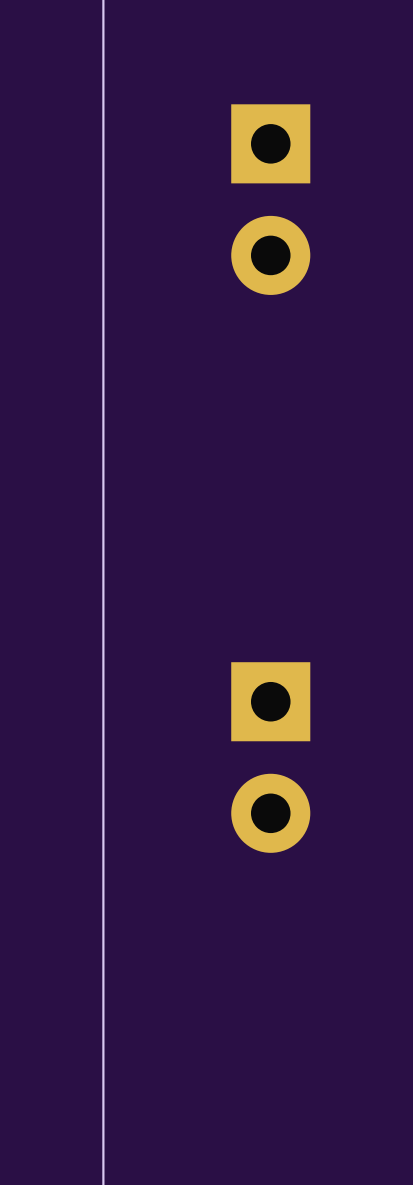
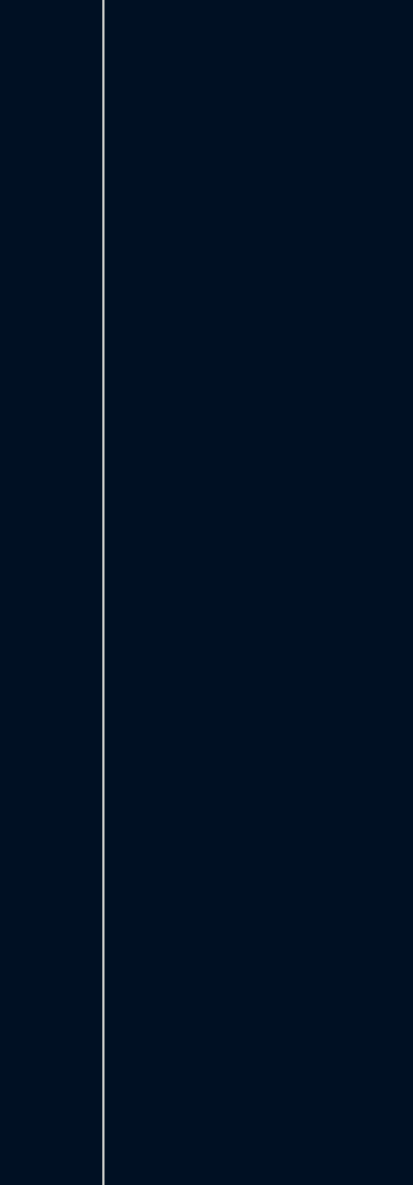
part: (270, 199) -> none
part: (270, 757) -> none

